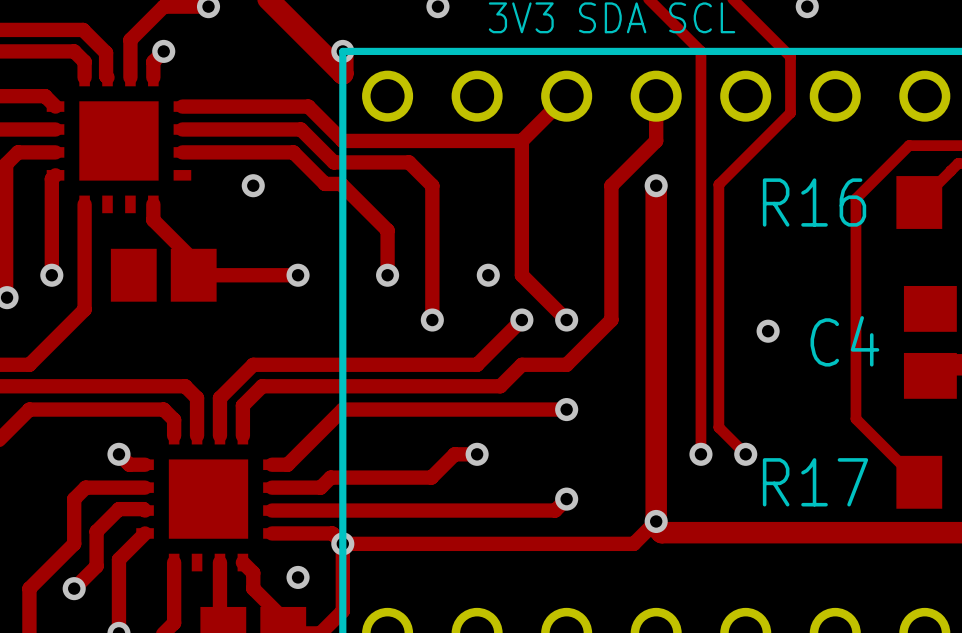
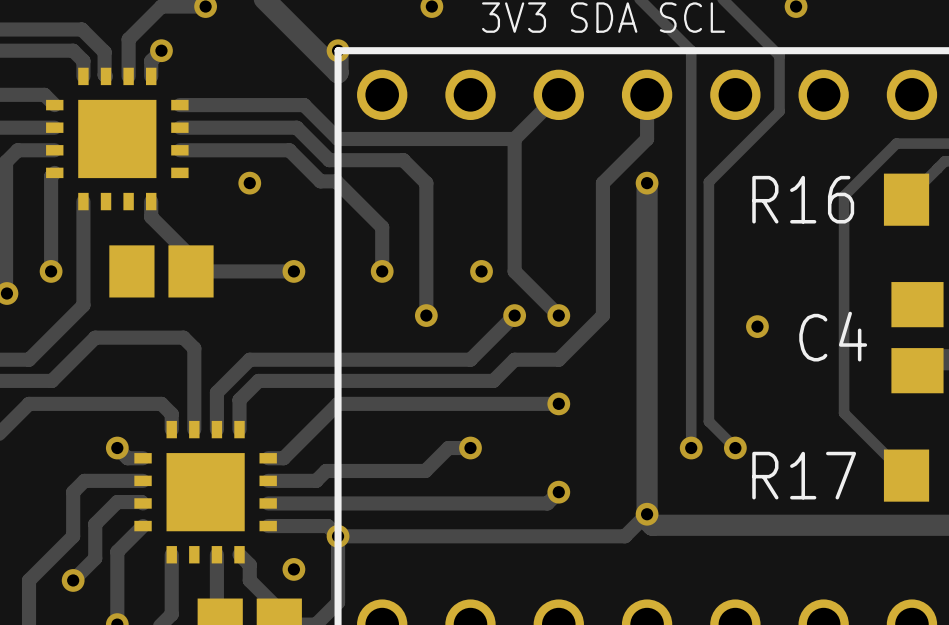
track: (52, 386) (185, 386) (197, 398) -> (51, 380) (95, 337) (183, 337) (194, 348) (194, 392)

